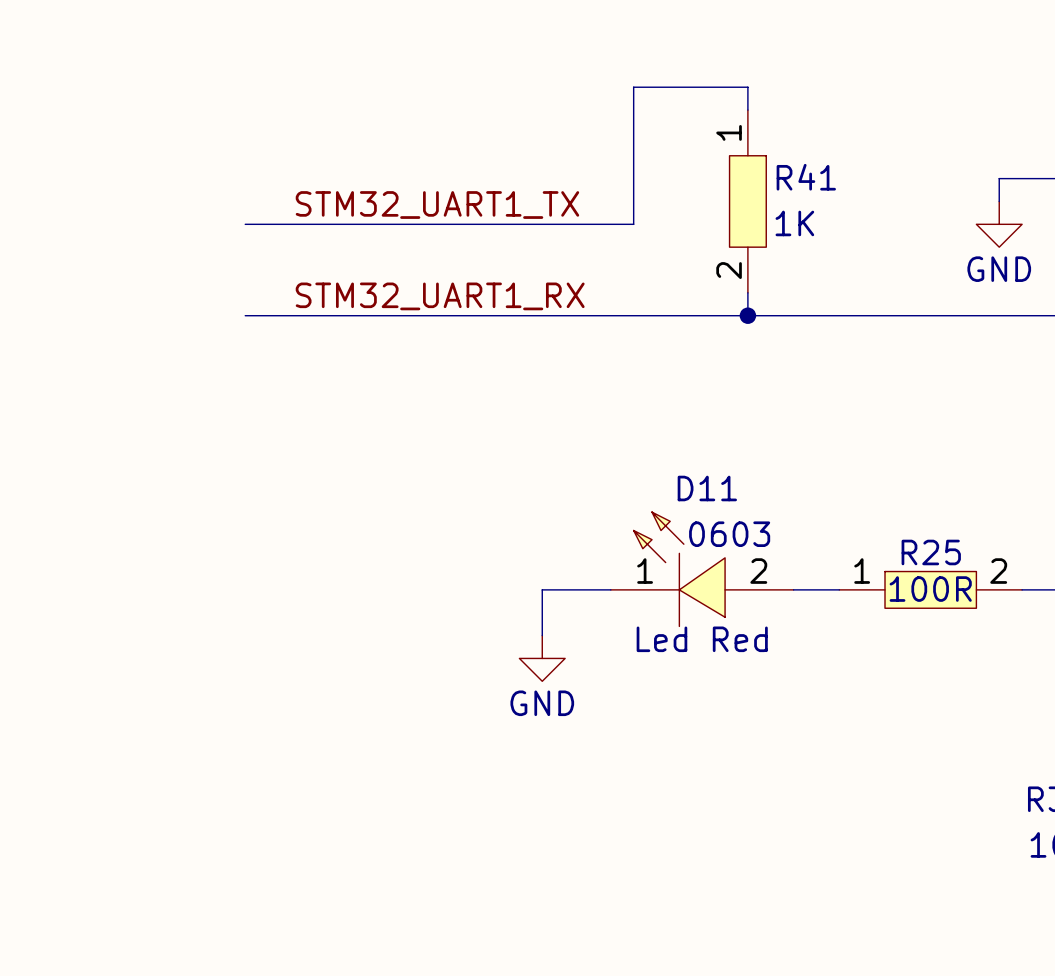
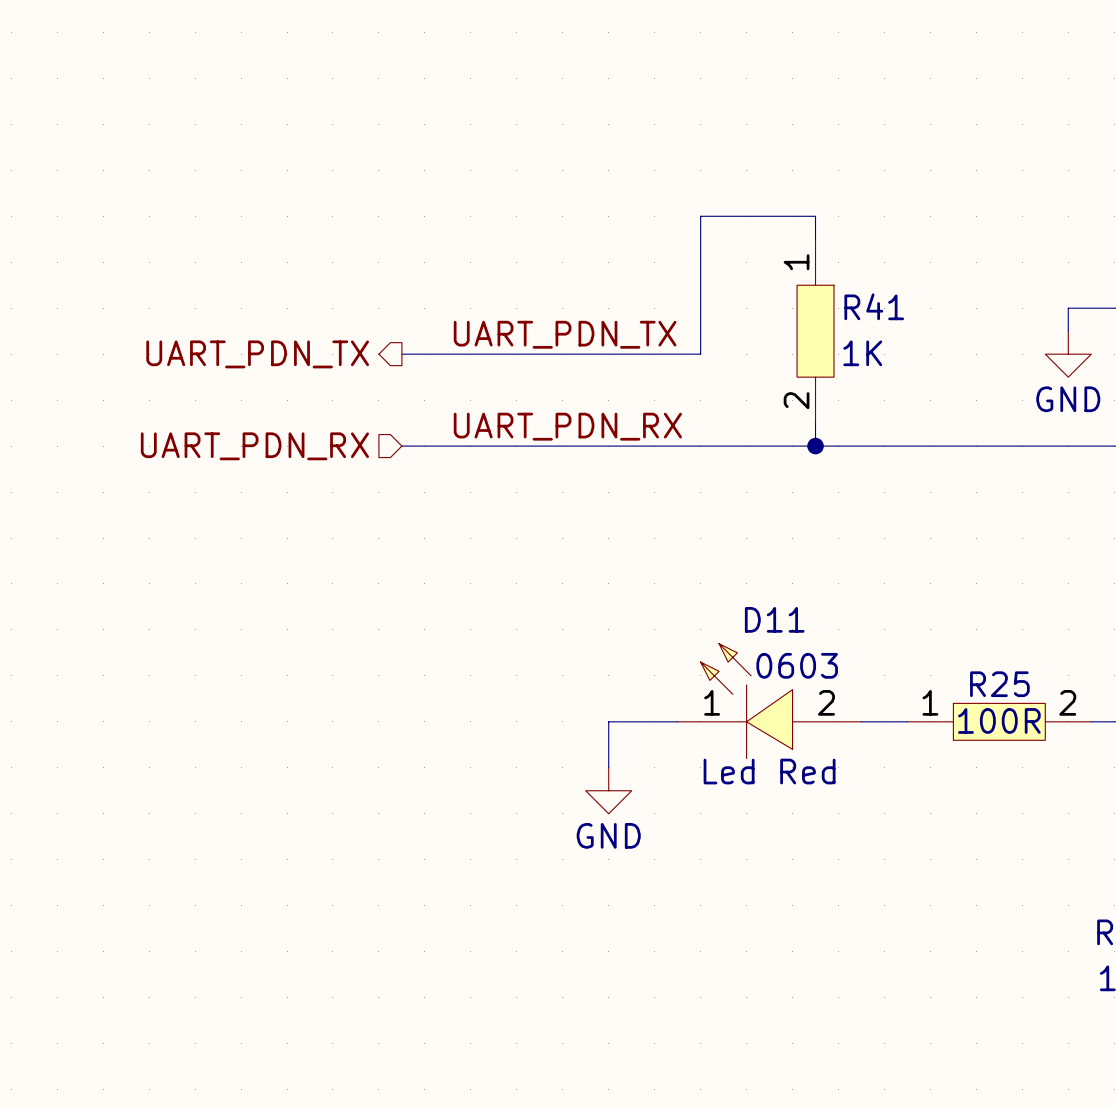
label: STM32_UART1_TX (437, 205) -> none
label: none -> UART_PDN_TX (565, 334)
hierarchical label: none -> UART_PDN_TX (257, 354)
wire: (245, 224) (336, 224) -> none
label: STM32_UART1_RX (440, 296) -> none
label: none -> UART_PDN_RX (567, 426)
hierarchical label: none -> UART_PDN_RX (254, 446)
wire: (245, 315) (336, 315) -> none

